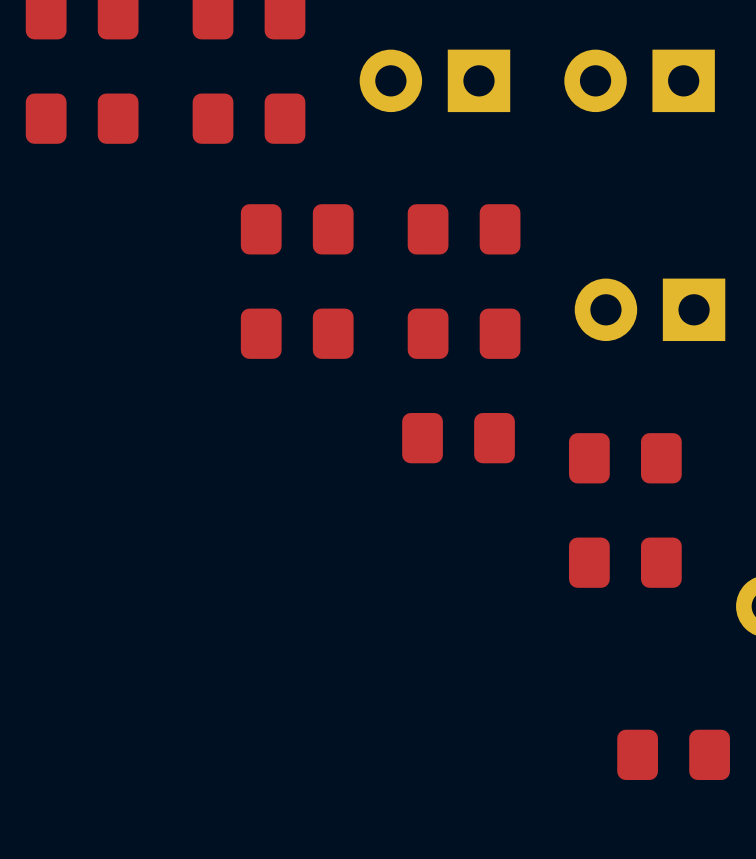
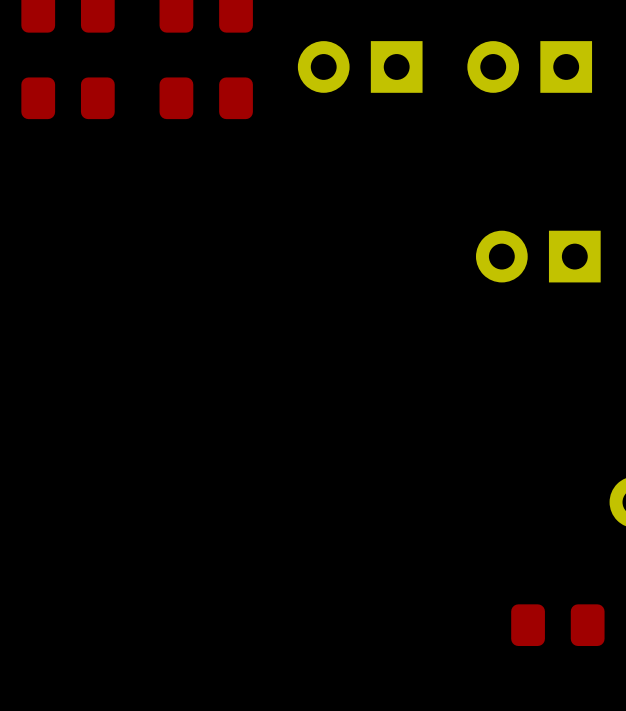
part: (297, 229) -> none
part: (464, 229) -> none
part: (297, 333) -> none
part: (464, 333) -> none
part: (458, 438) -> none
part: (625, 458) -> none
part: (625, 562) -> none

